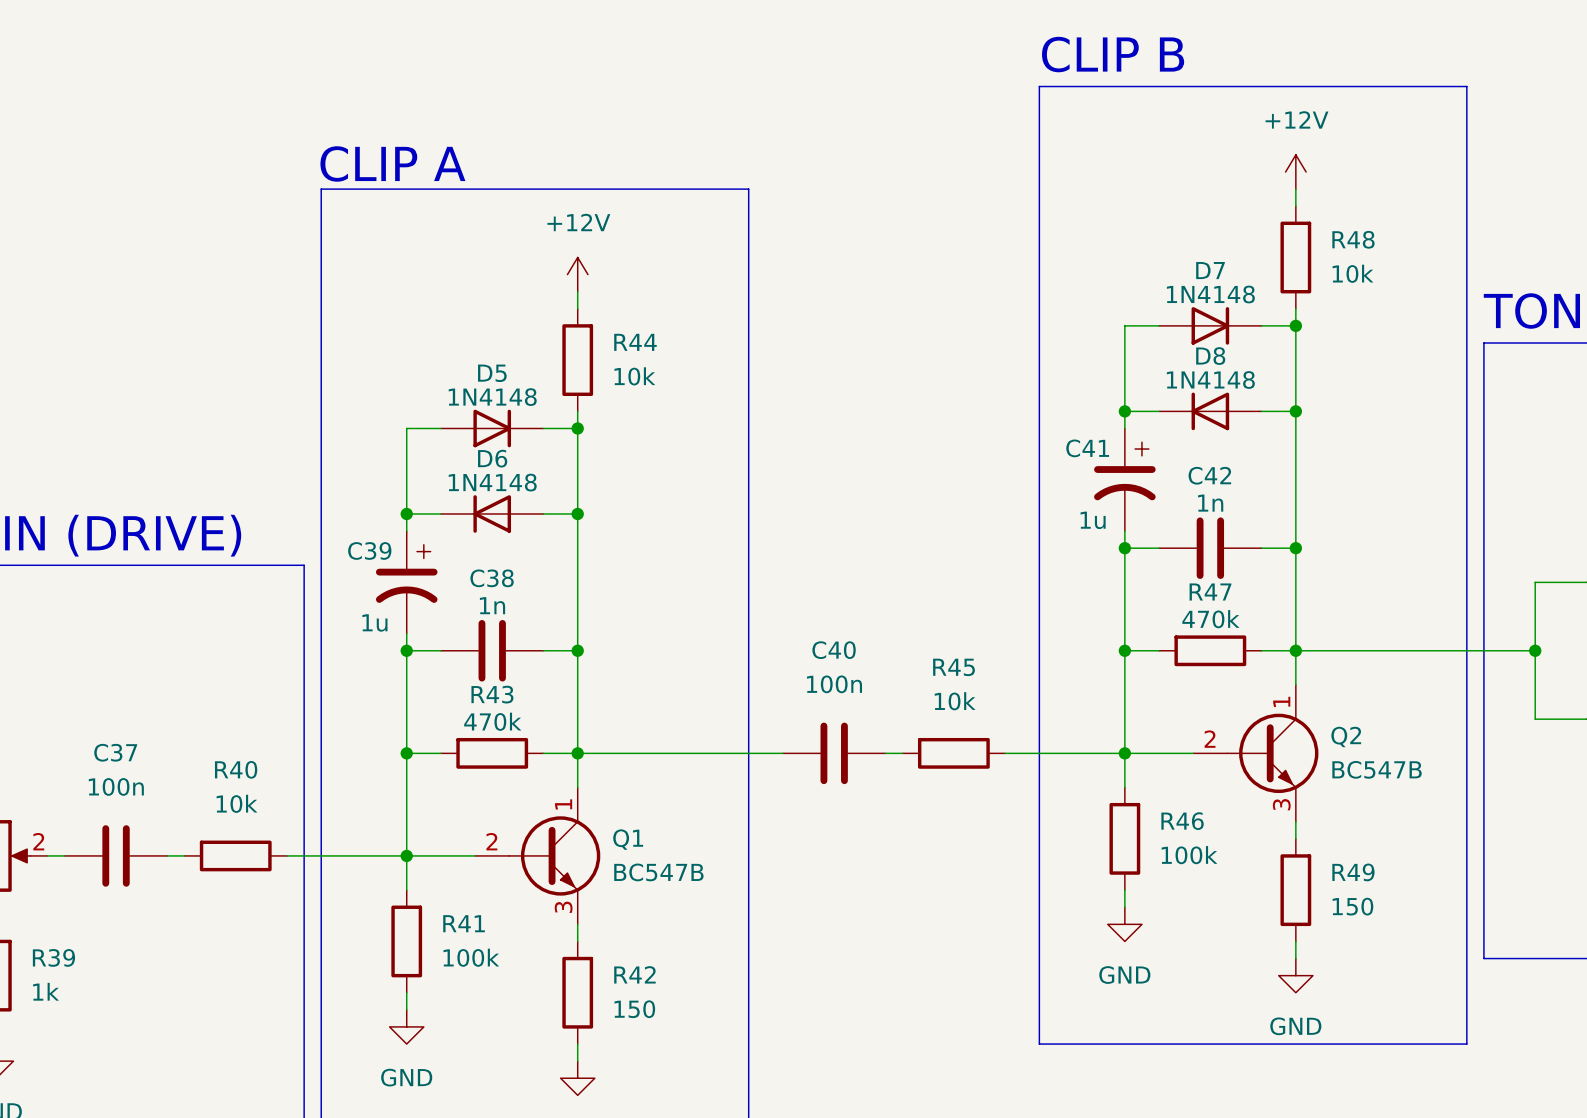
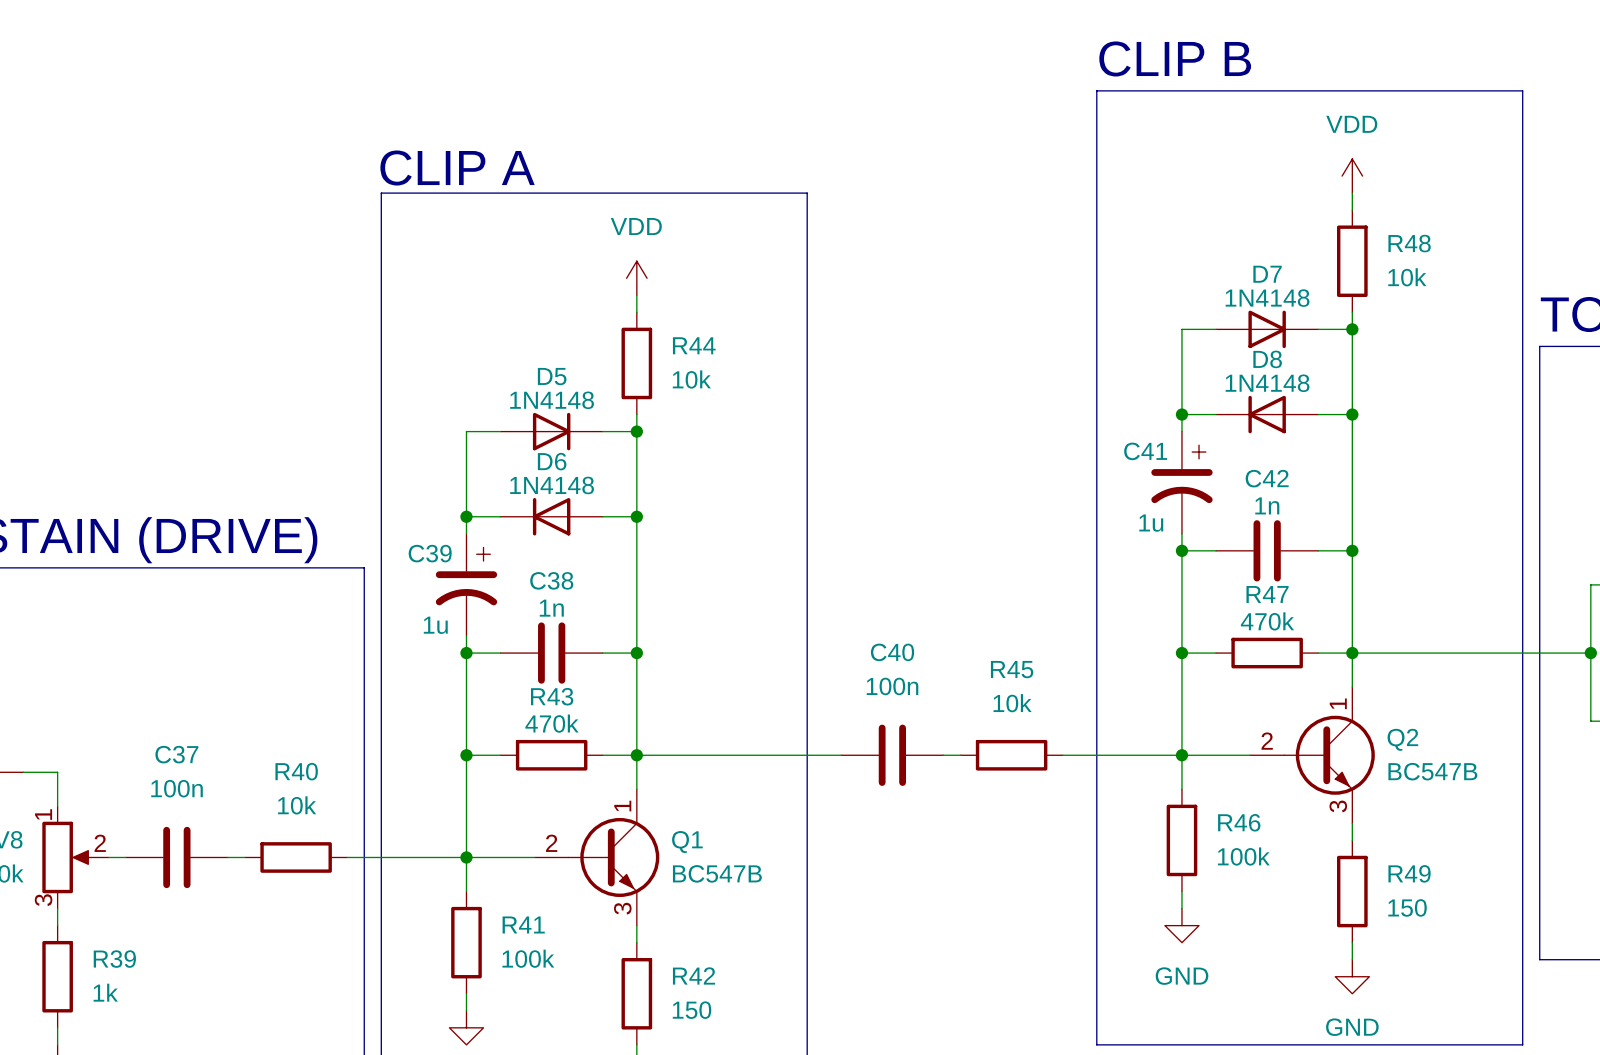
power symbol: +12V (1295, 172) -> VDD (1352, 176)
power symbol: +12V (577, 274) -> VDD (636, 278)

